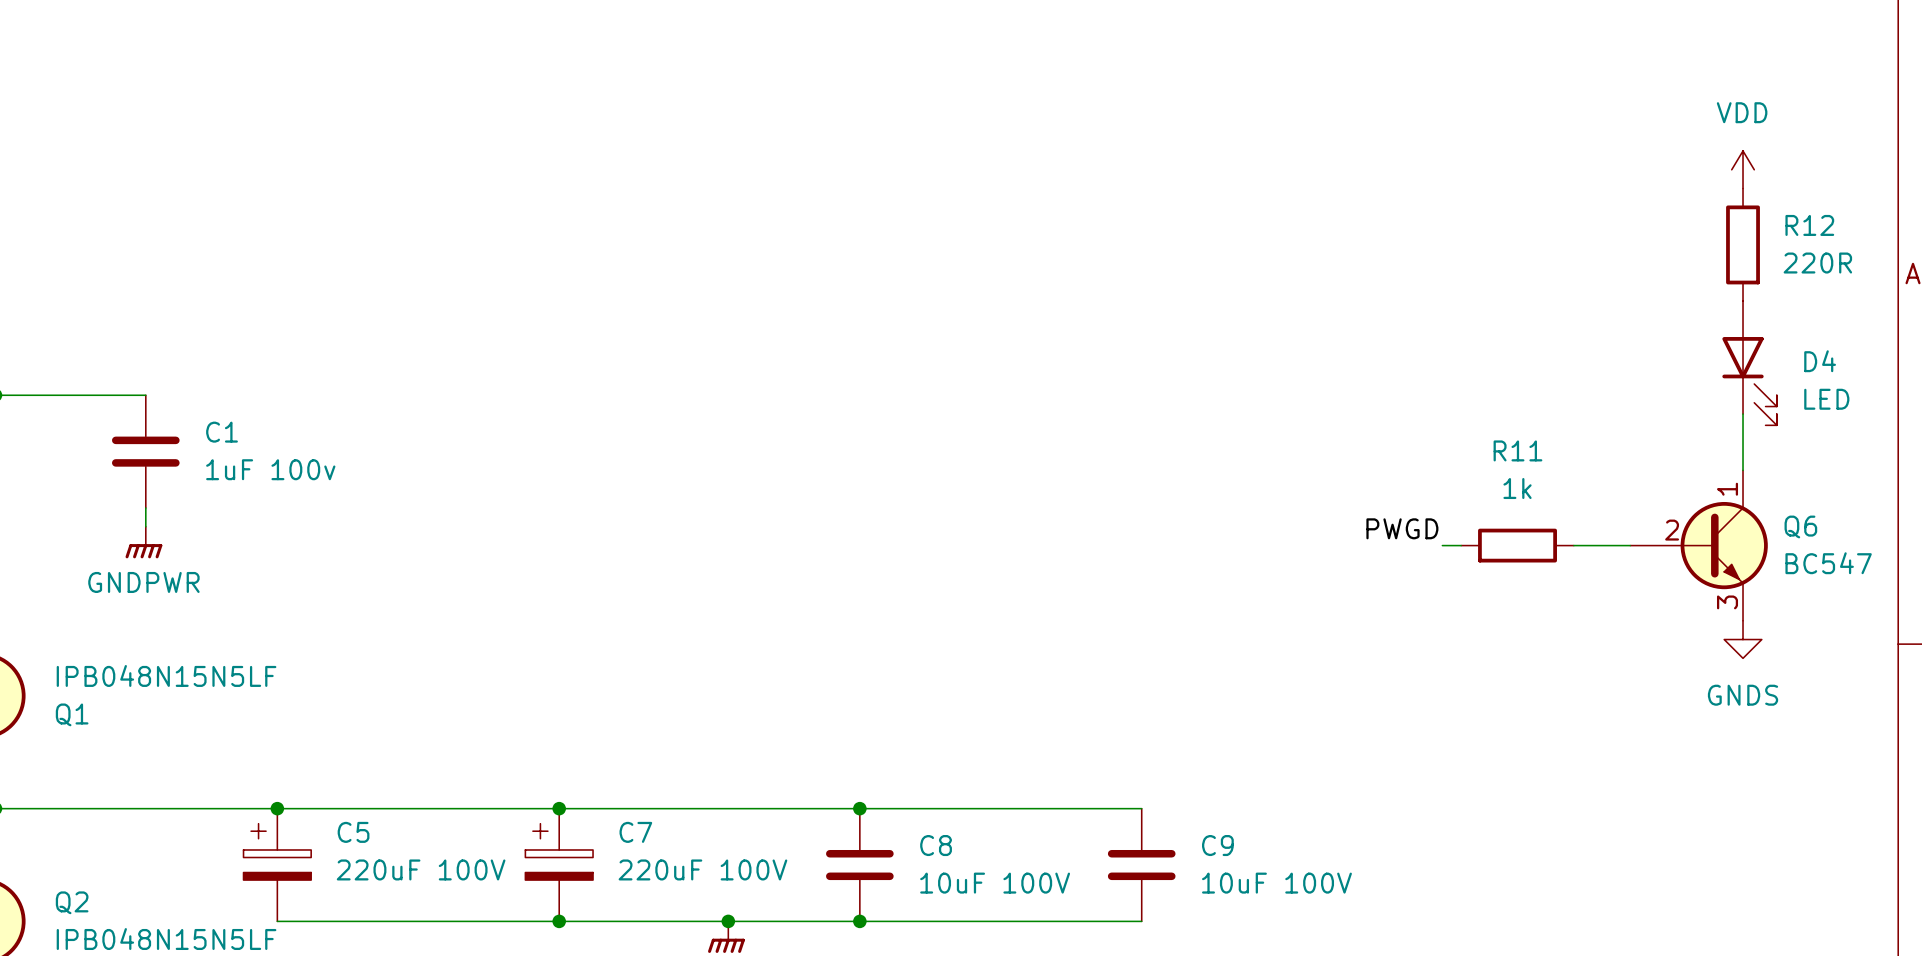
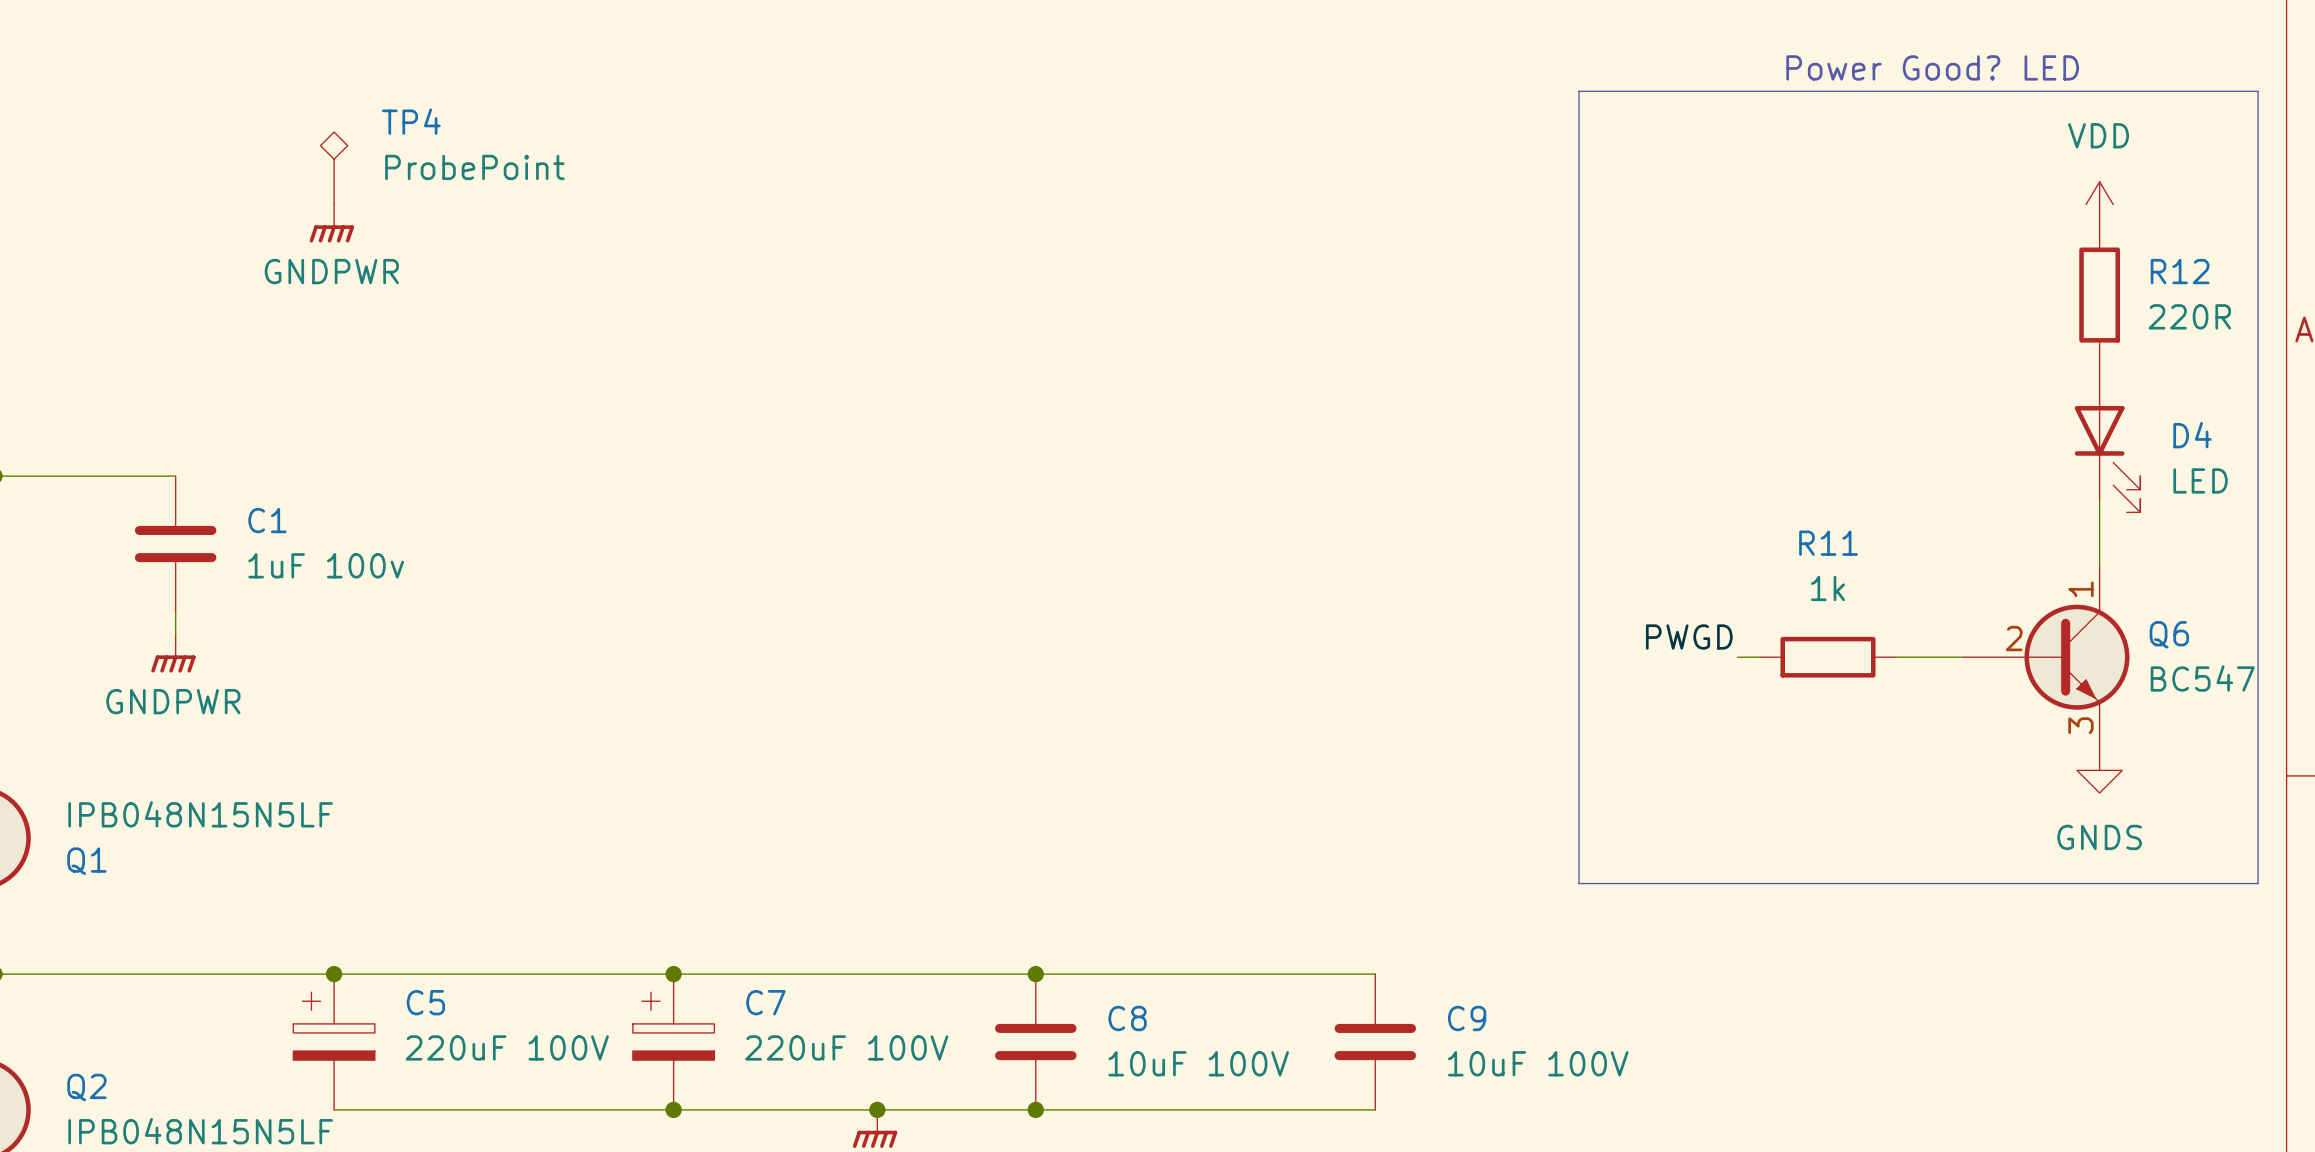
text: none -> Power Good? LED (1932, 67)
line: none -> (1579, 91) (2258, 91) (2258, 883) (1579, 883) (1579, 91)
TP4: none -> ProbePoint (334, 168)
power symbol: none -> GNDPWR (331, 223)

